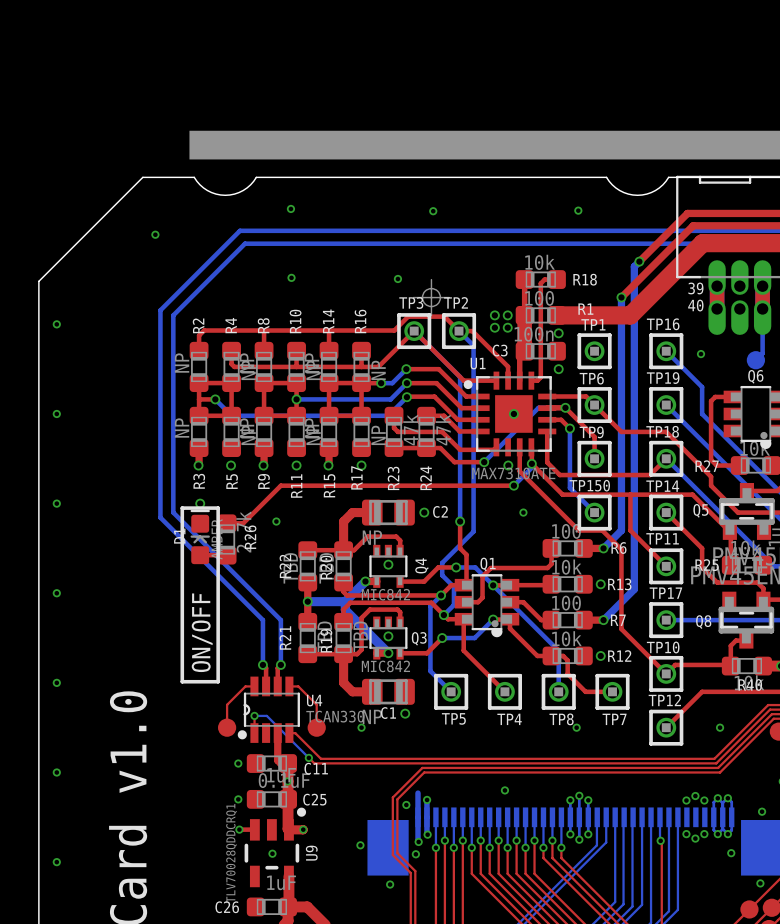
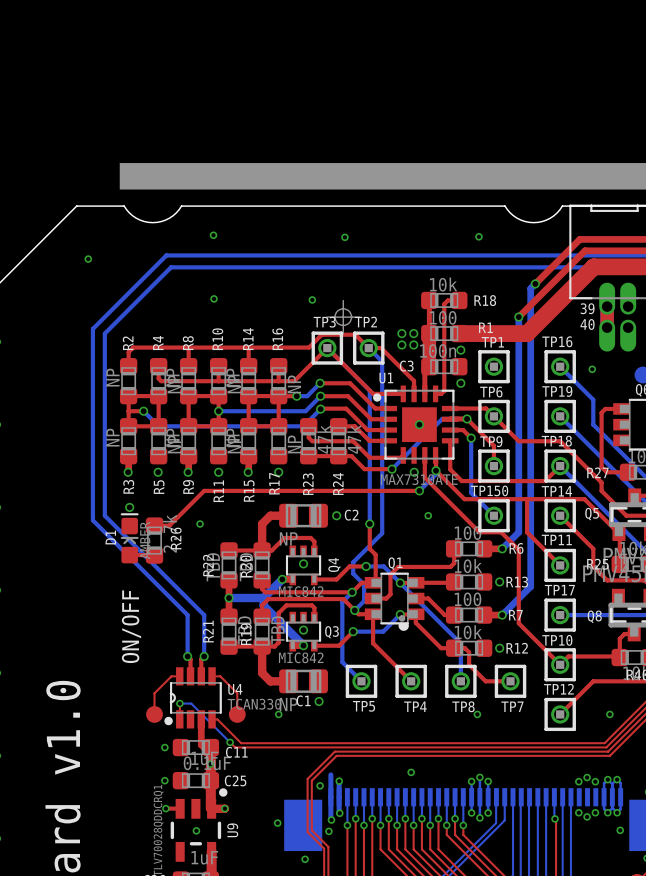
line: (182, 508) (182, 681) (218, 681) (218, 508) (182, 508) -> none

